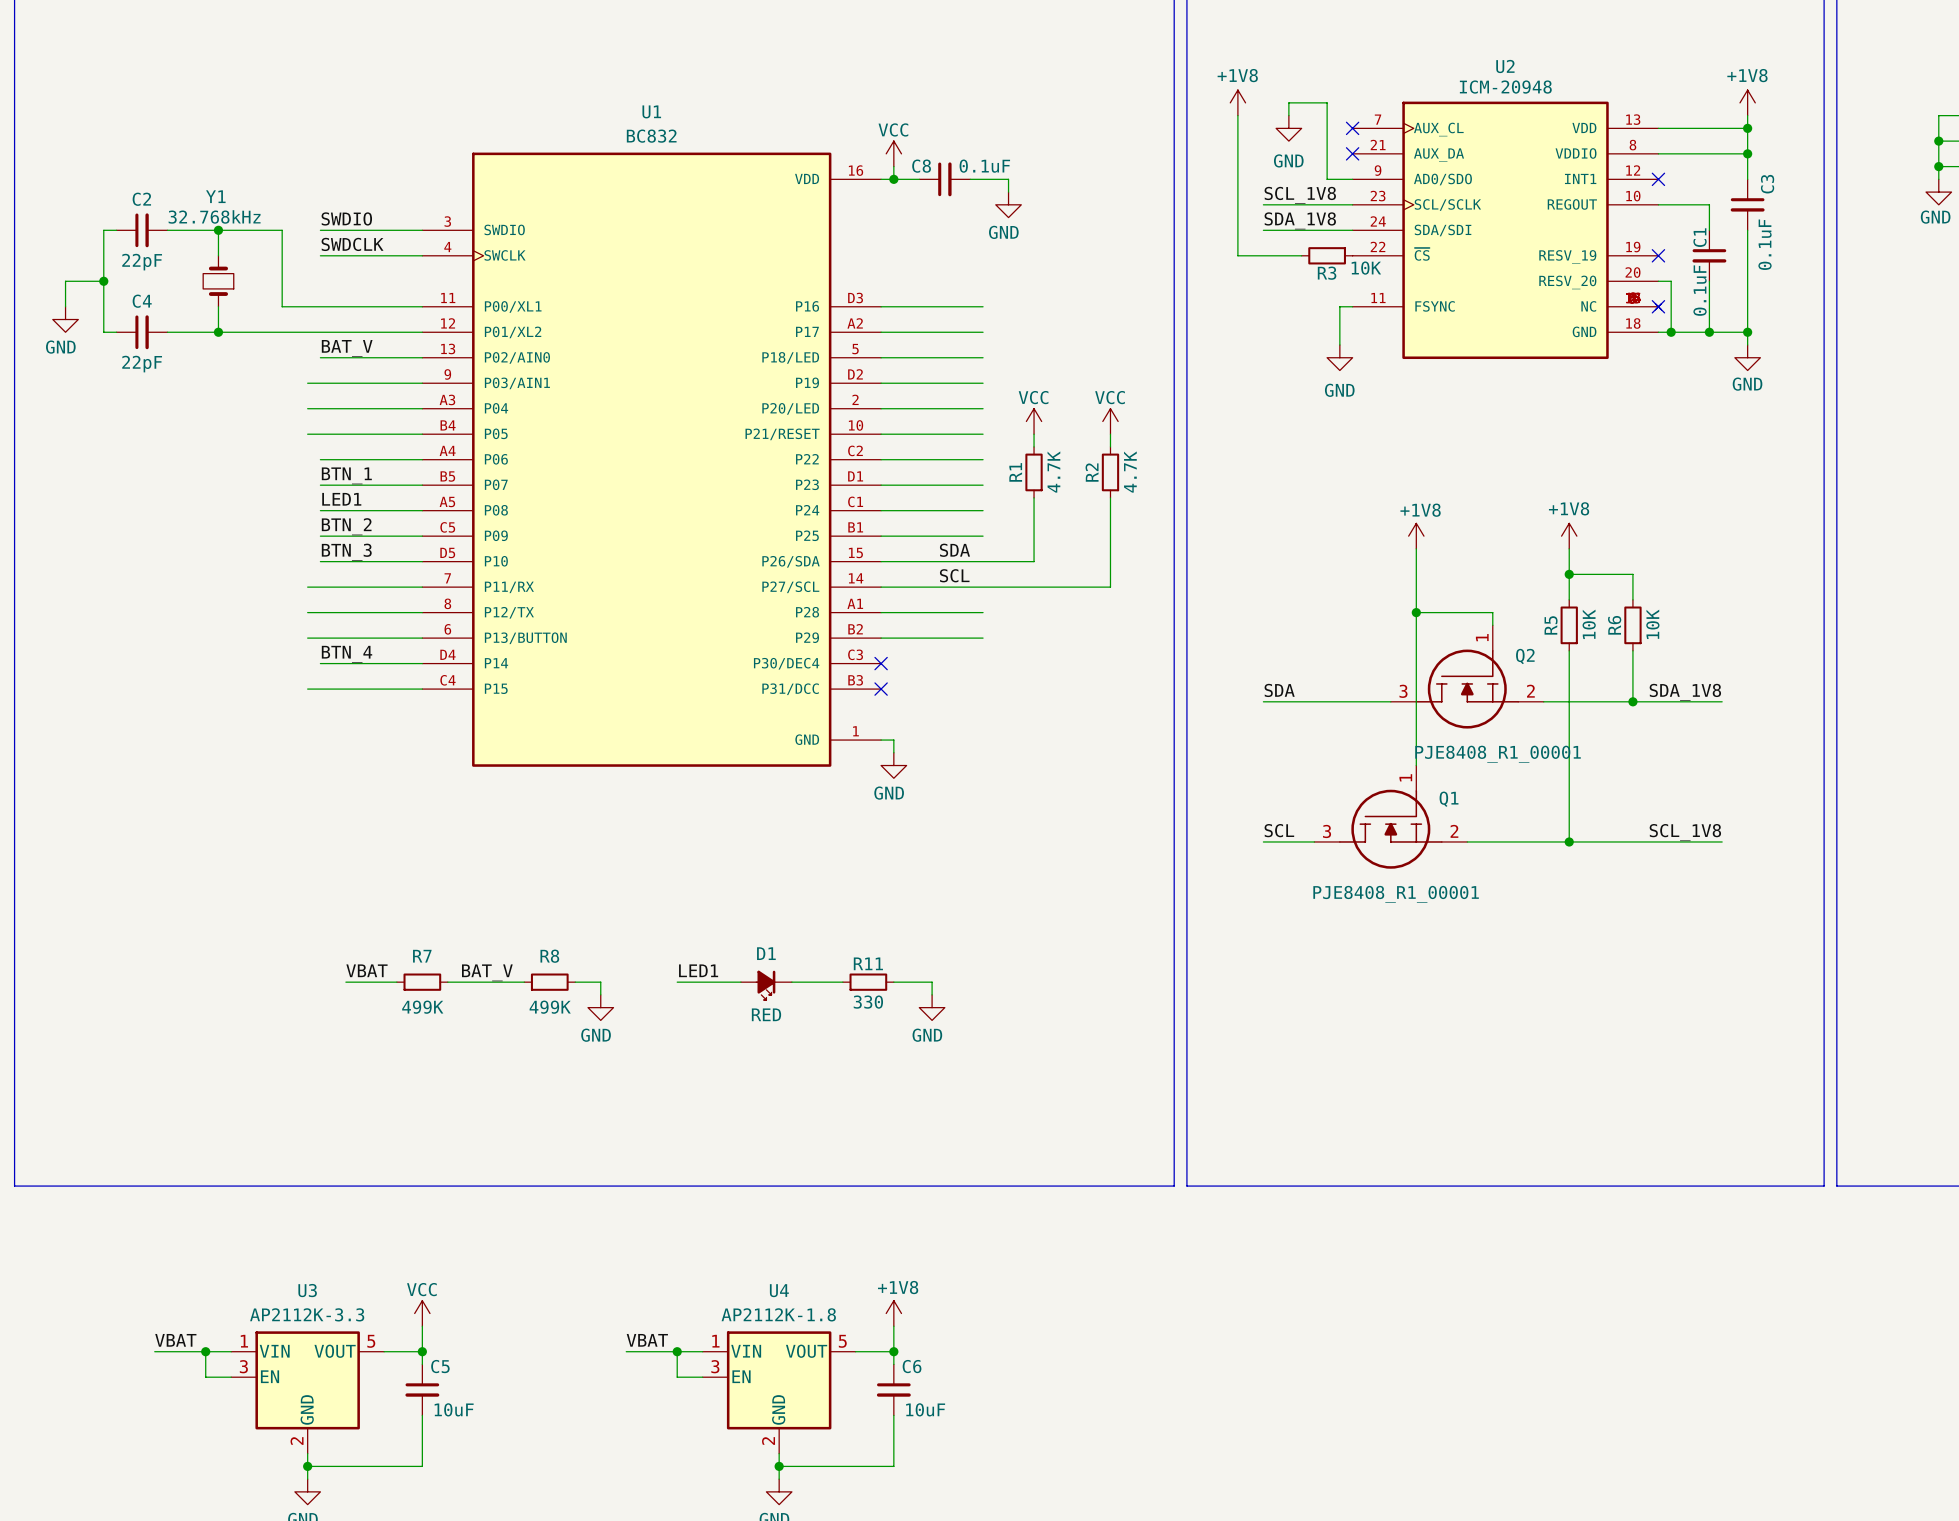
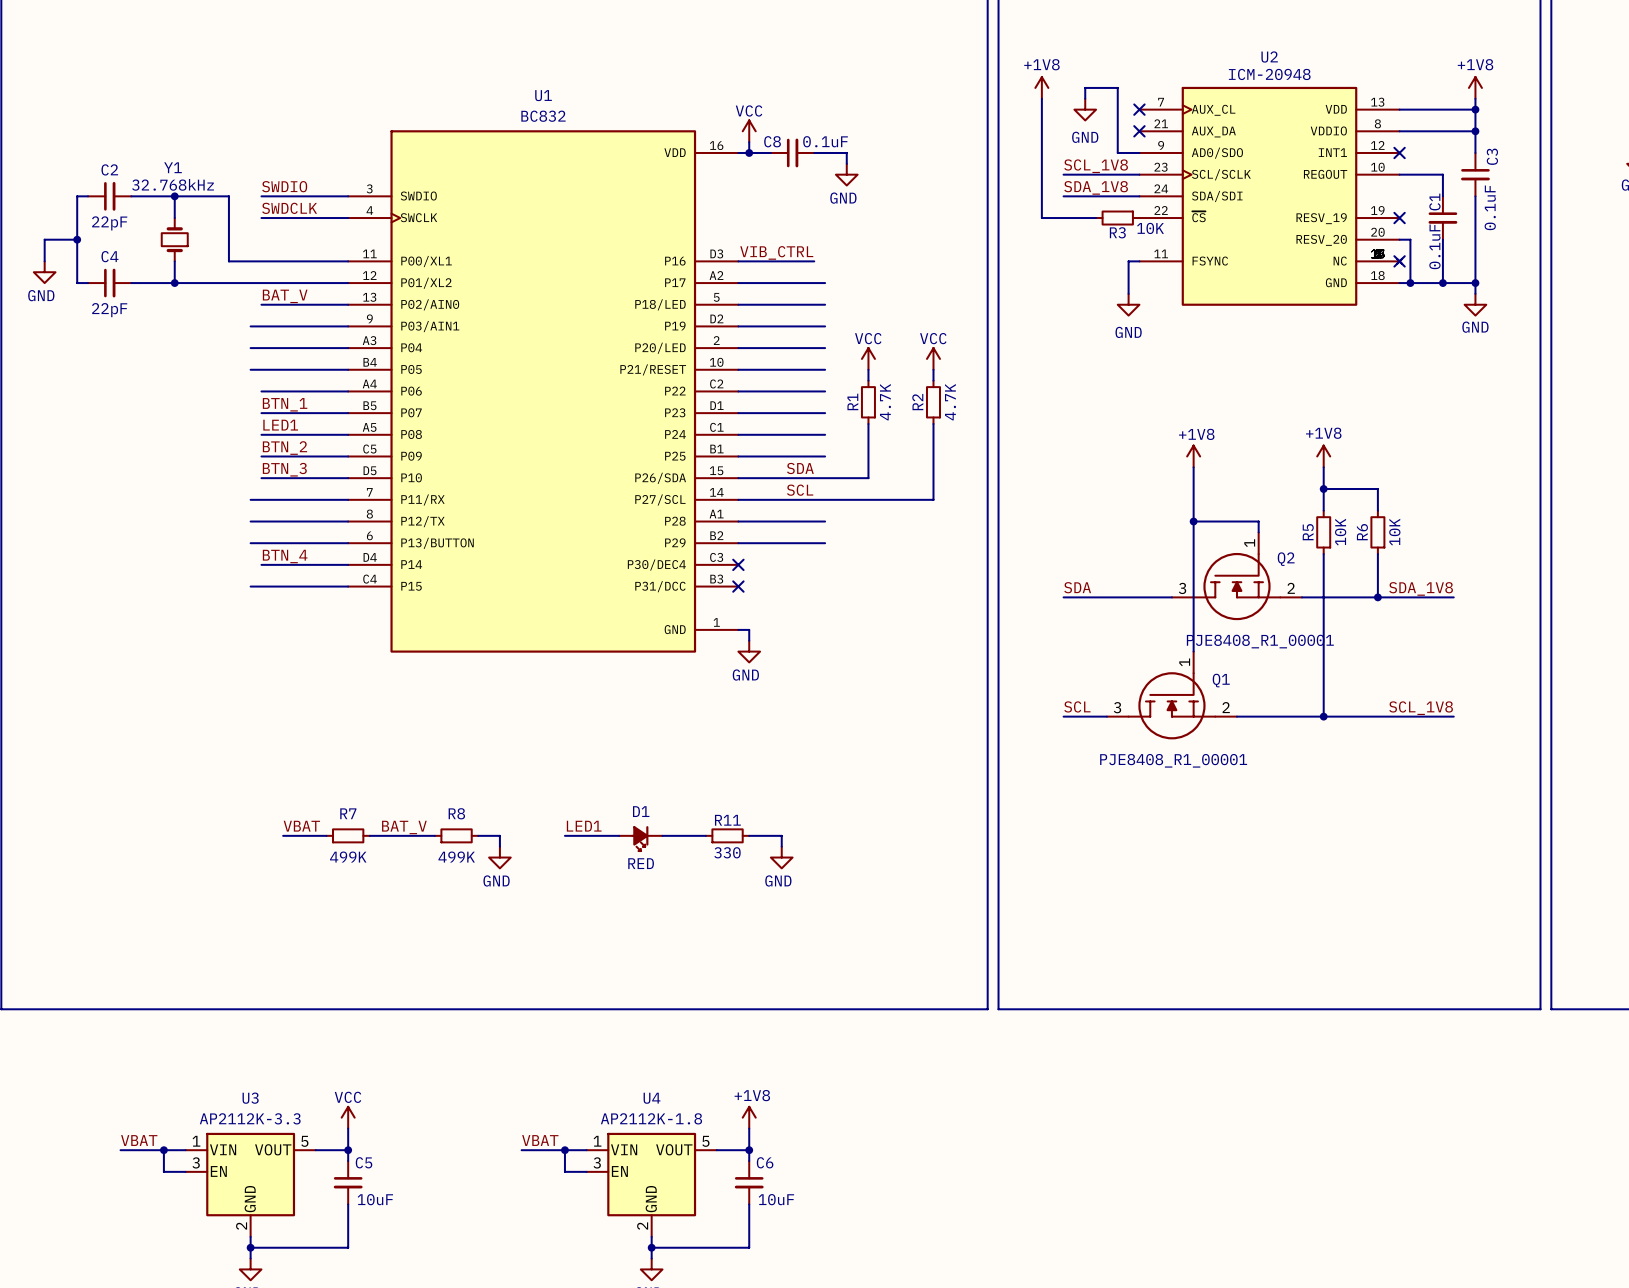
label: none -> VIB_CTRL (776, 252)
wire: (970, 306) (983, 306) -> none

